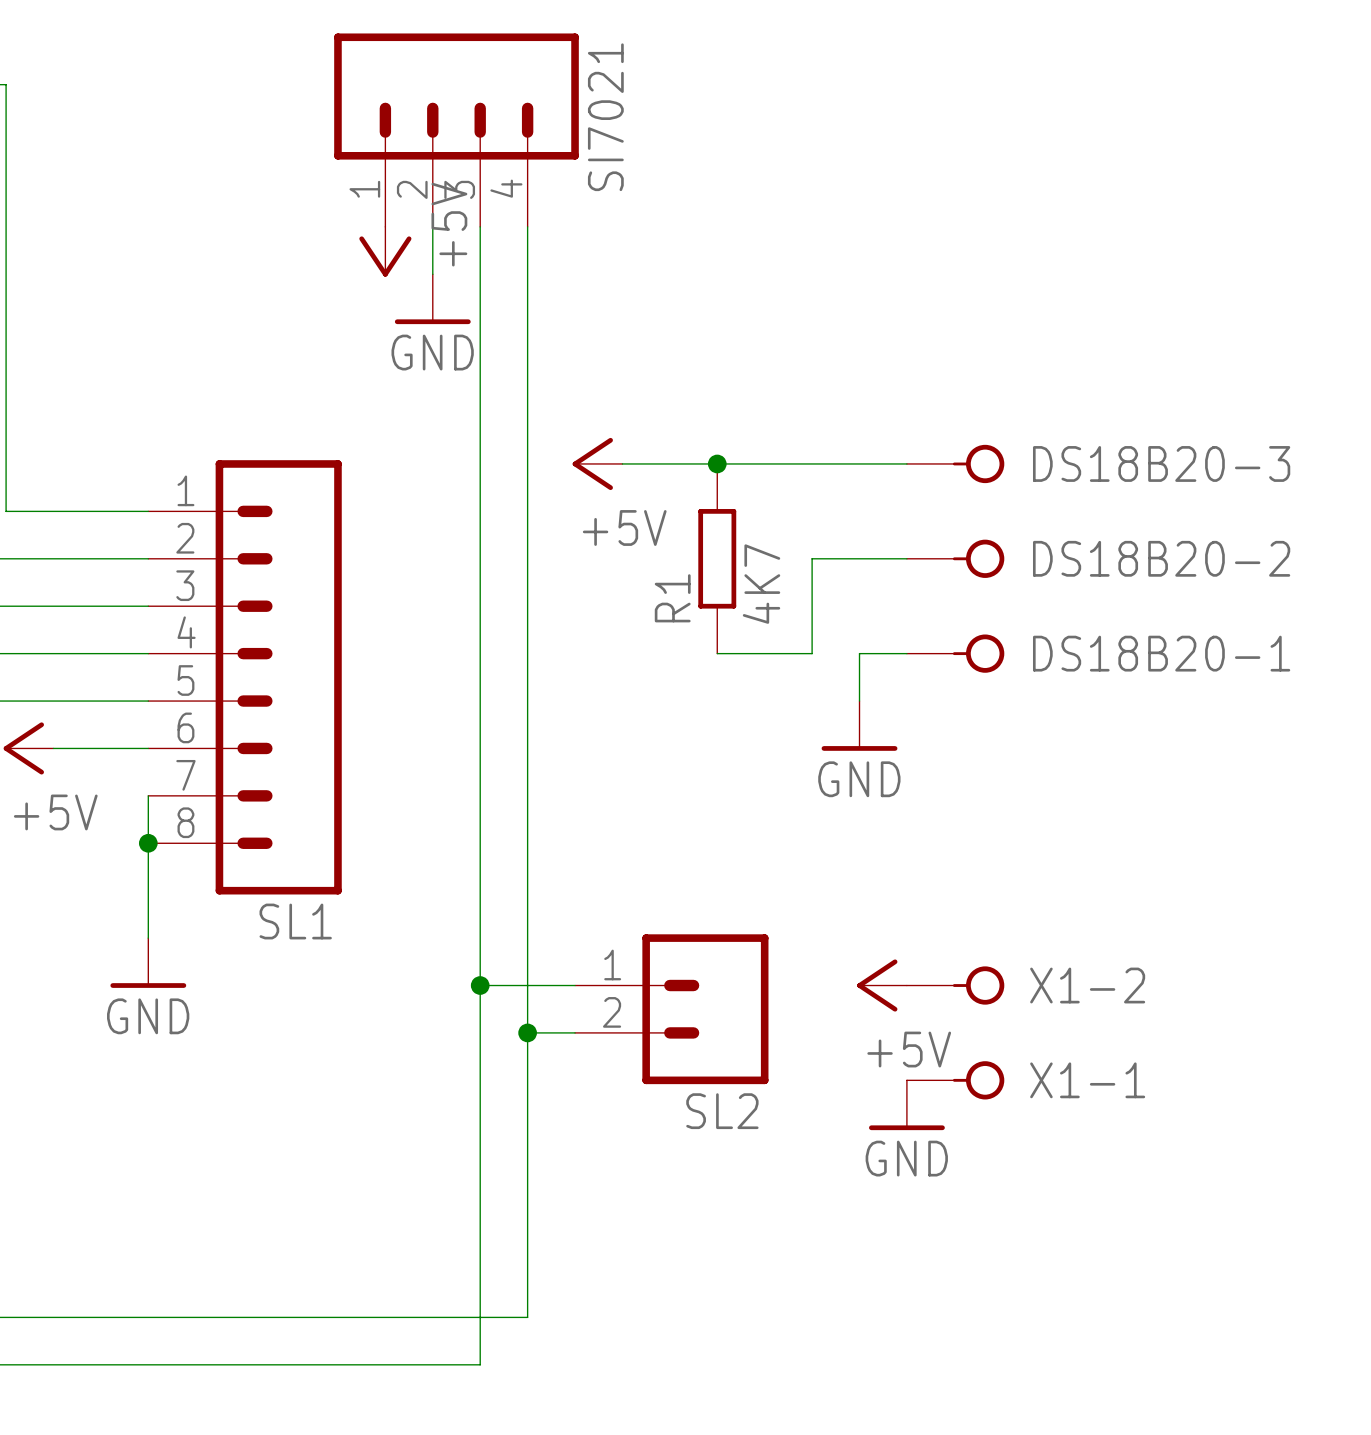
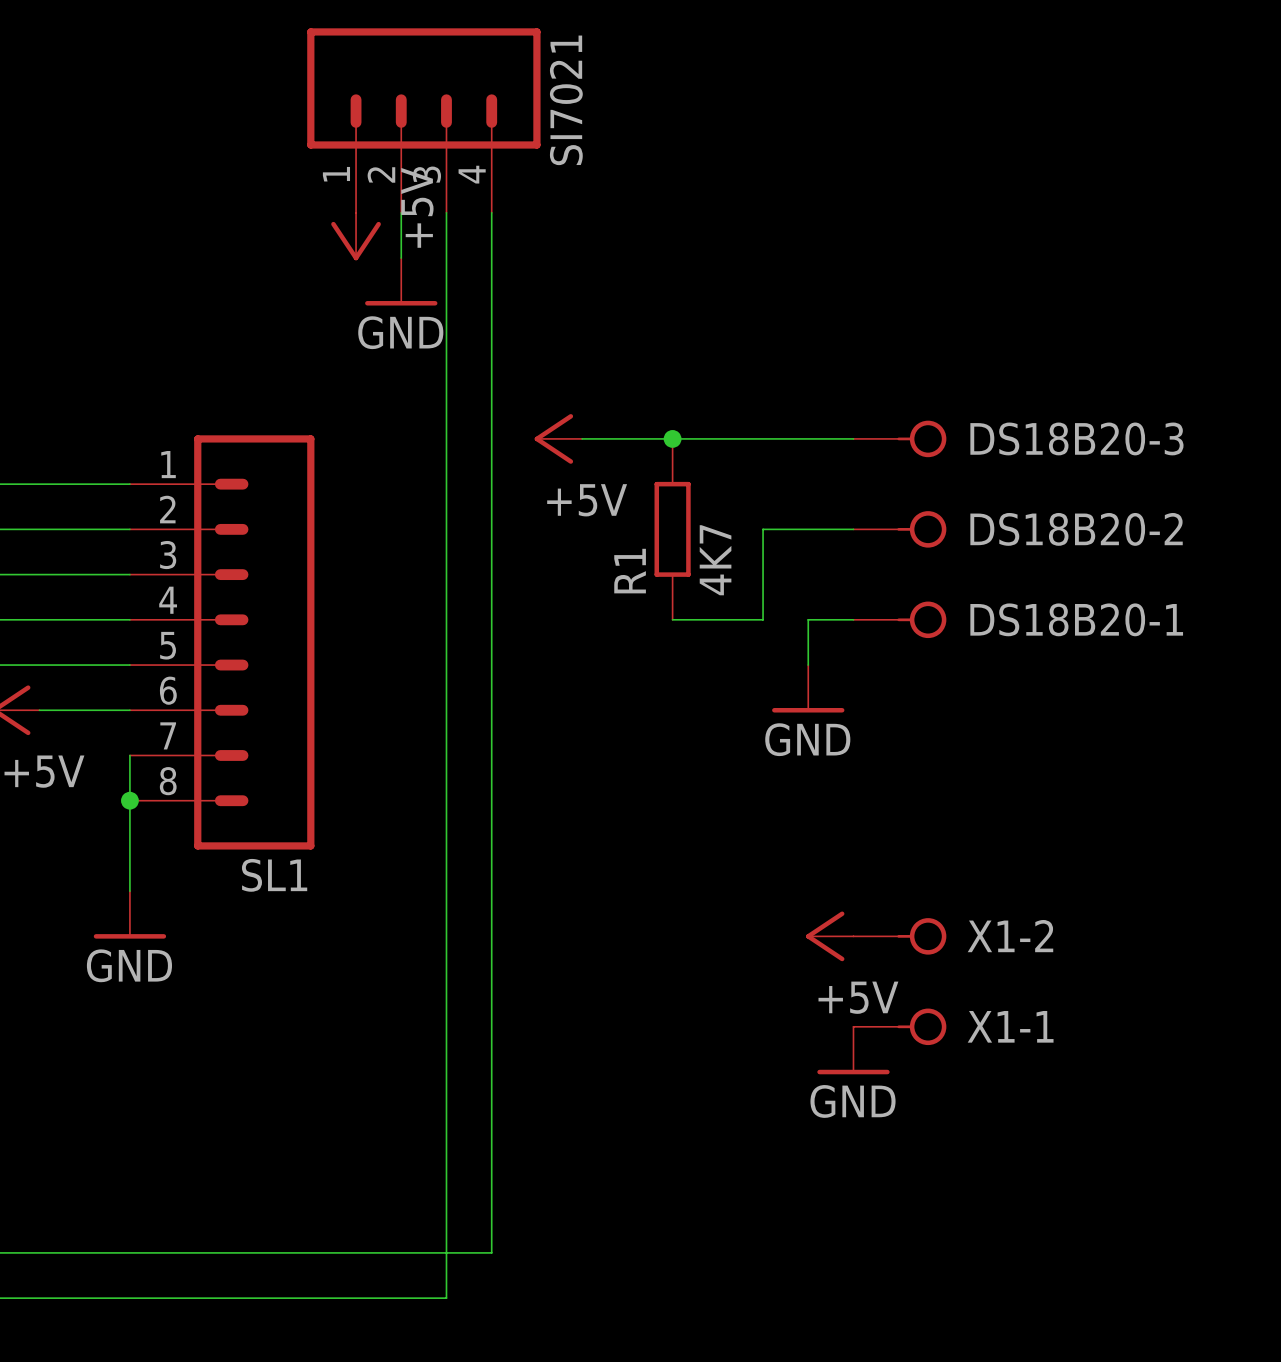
wire: (480, 985) (575, 985) -> none
junction: (480, 985) -> none
SL2: (671, 1009) -> none
wire: (527, 1032) (575, 1032) -> none
junction: (527, 1032) -> none

